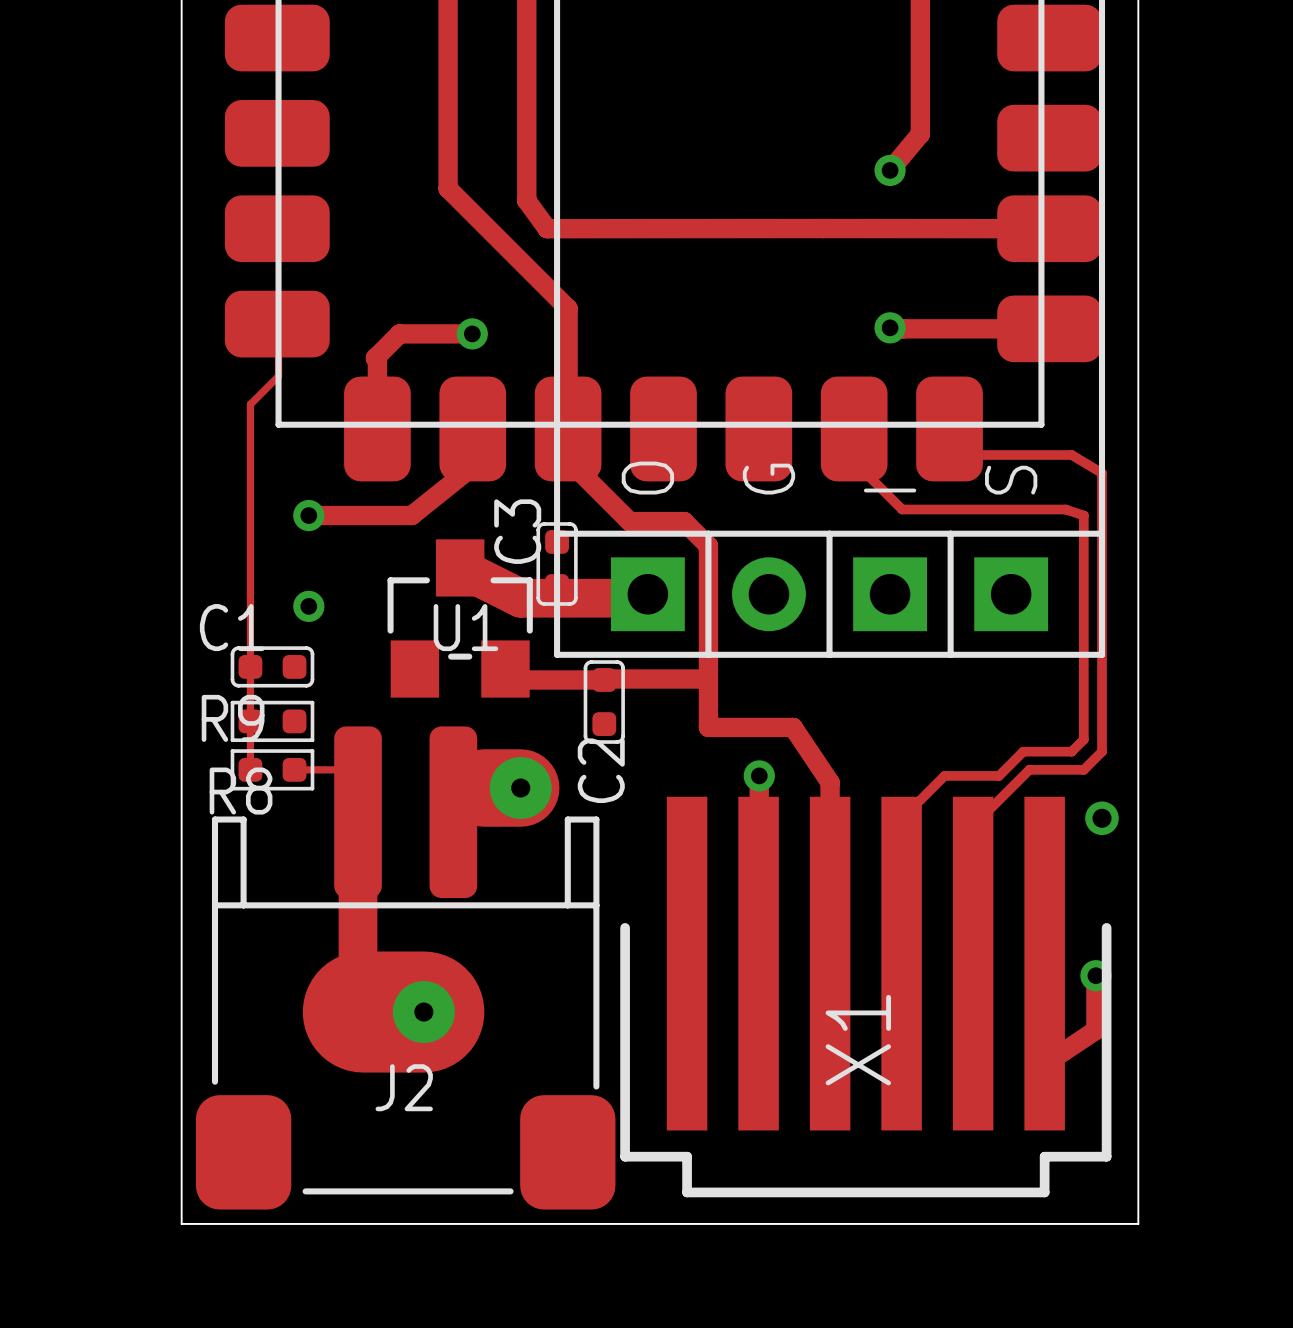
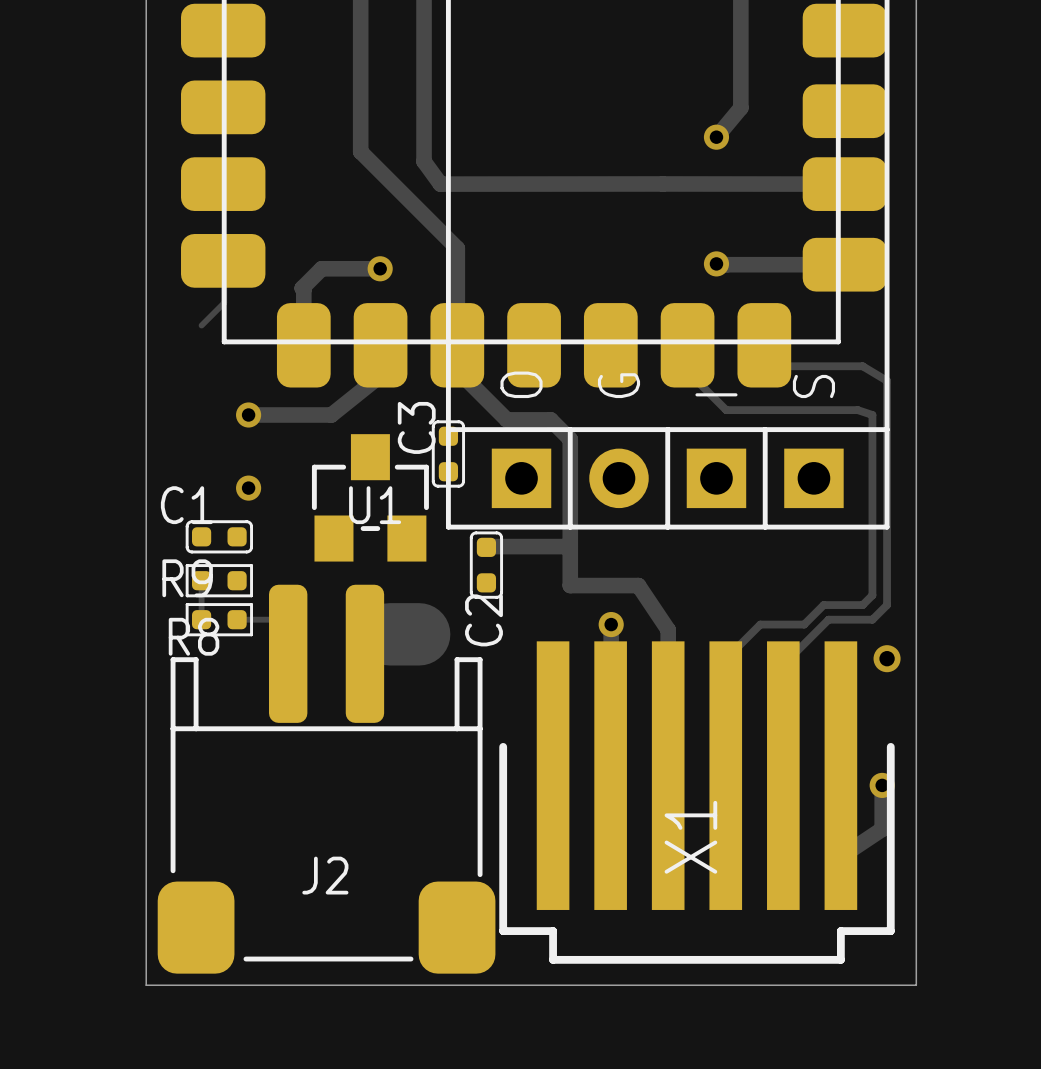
track: (250, 404) (250, 721) -> none
track: (460, 567) (520, 598) (633, 598) (647, 594) -> none
track: (505, 669) (518, 679) (605, 679) -> none
track: (358, 769) (358, 1006) (363, 1012) (423, 1012) -> none
via: (520, 788) -> none
via: (423, 1012) -> none

